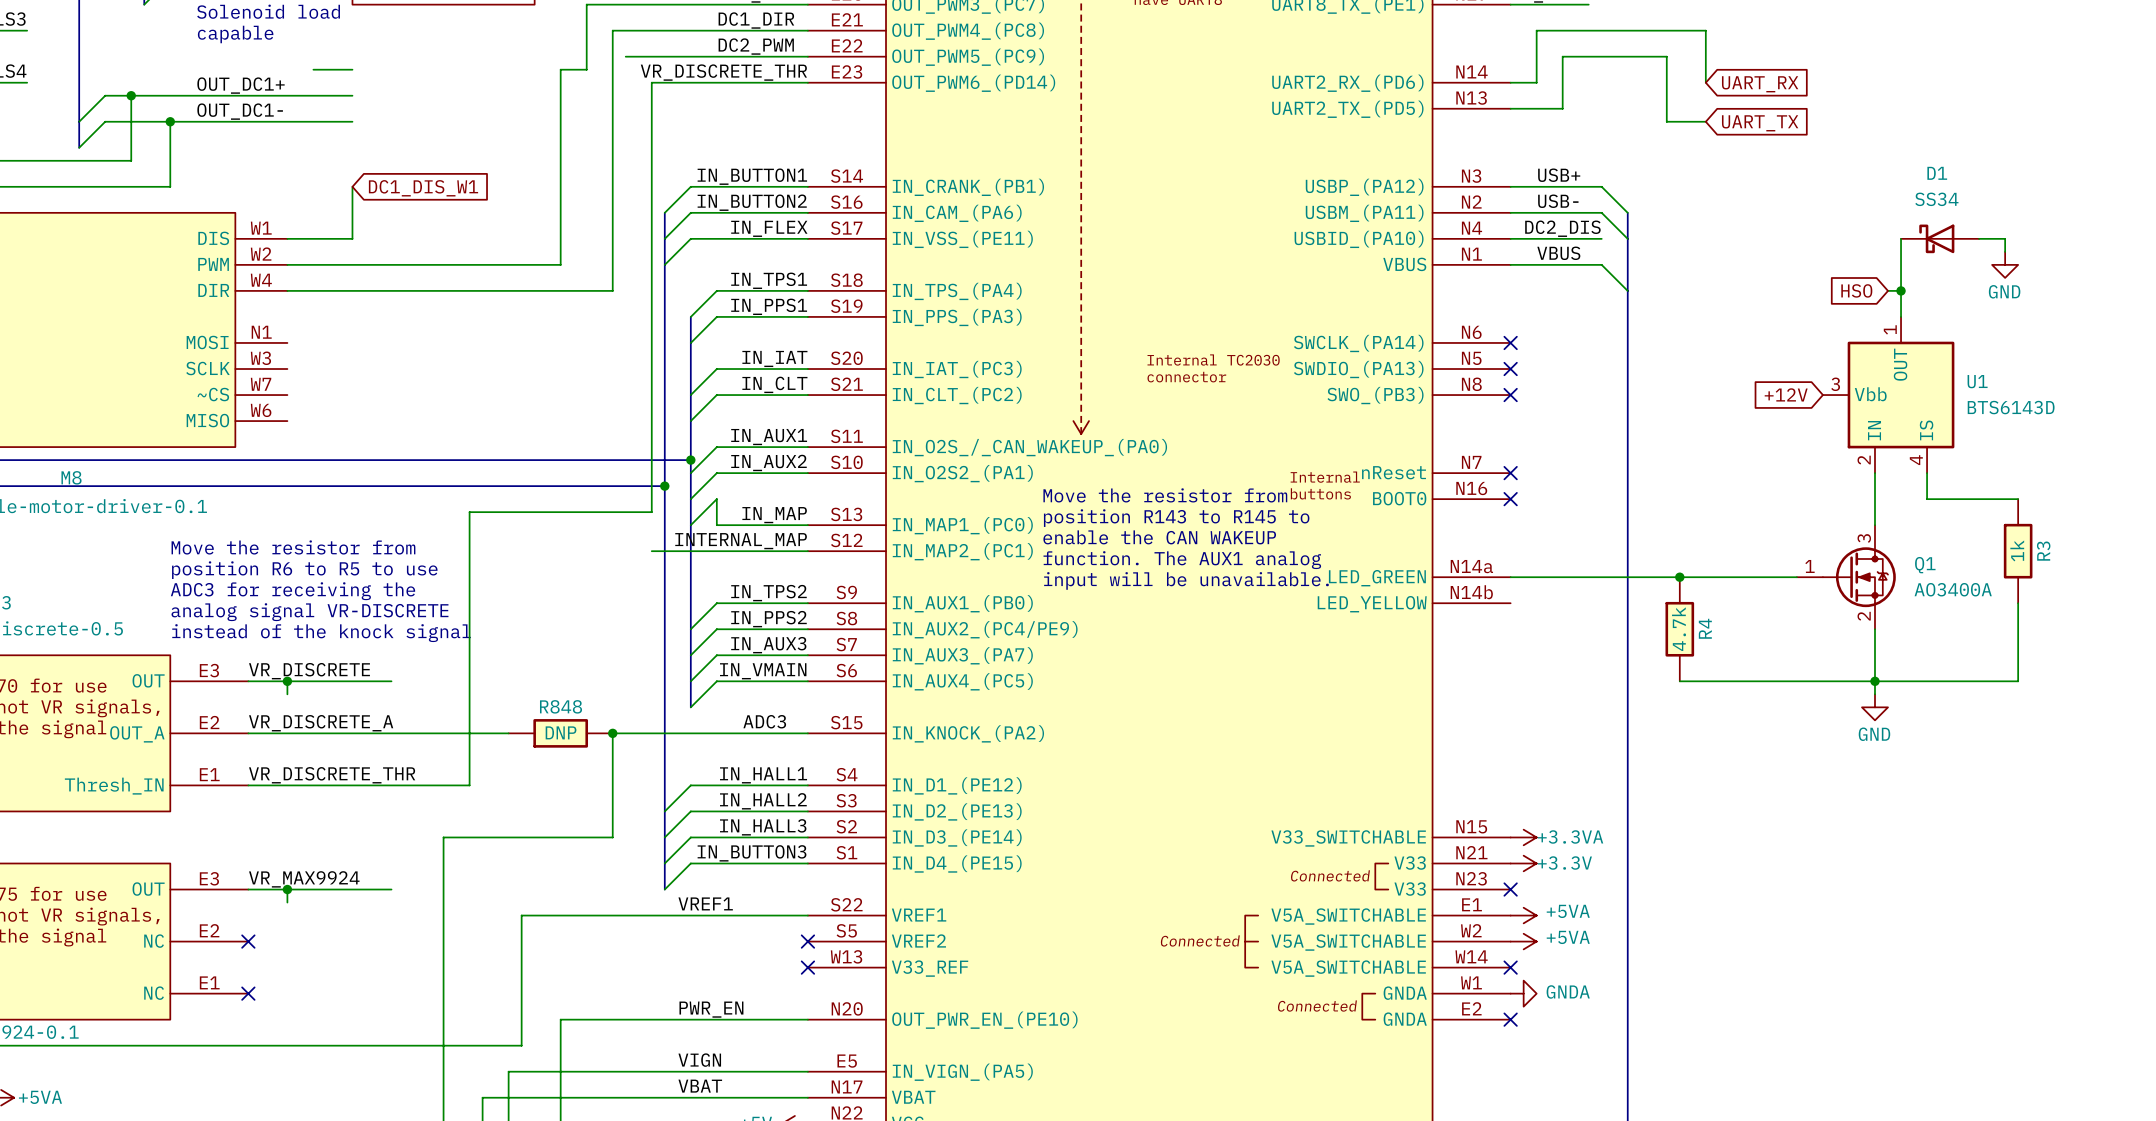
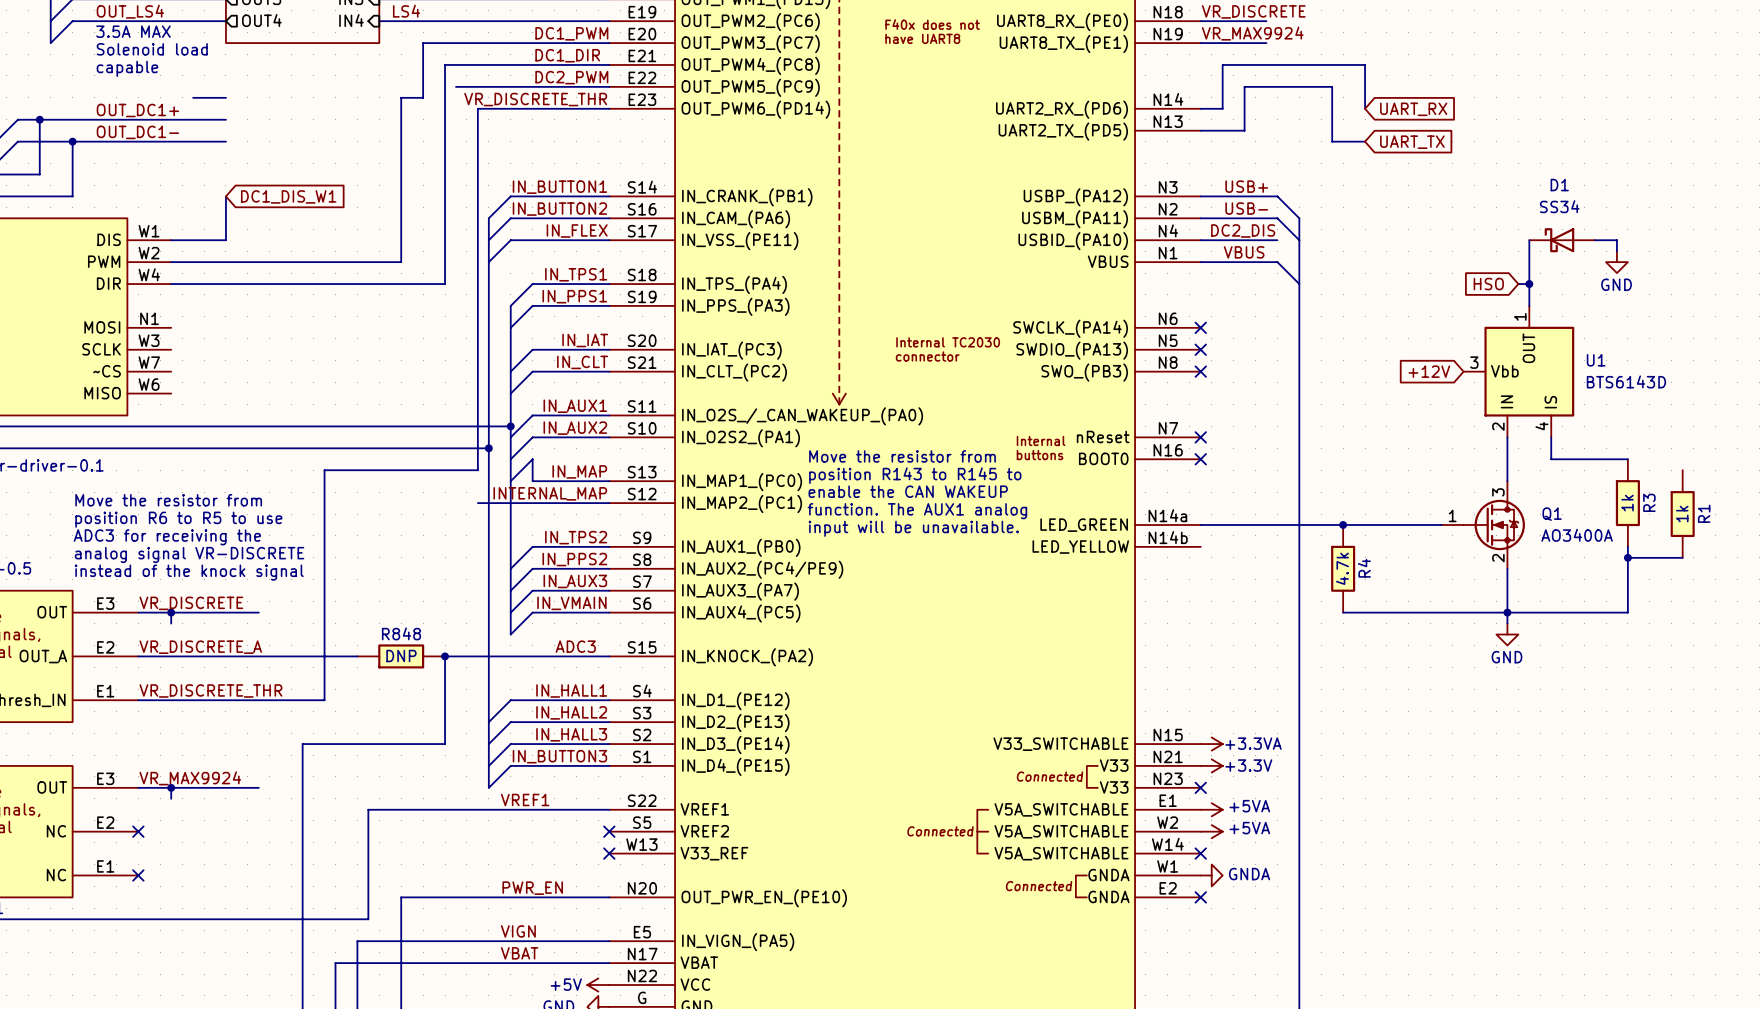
R1: none -> 1k (1682, 514)
wire: none -> (1627, 557) (1682, 557)
junction: none -> (1627, 557)

